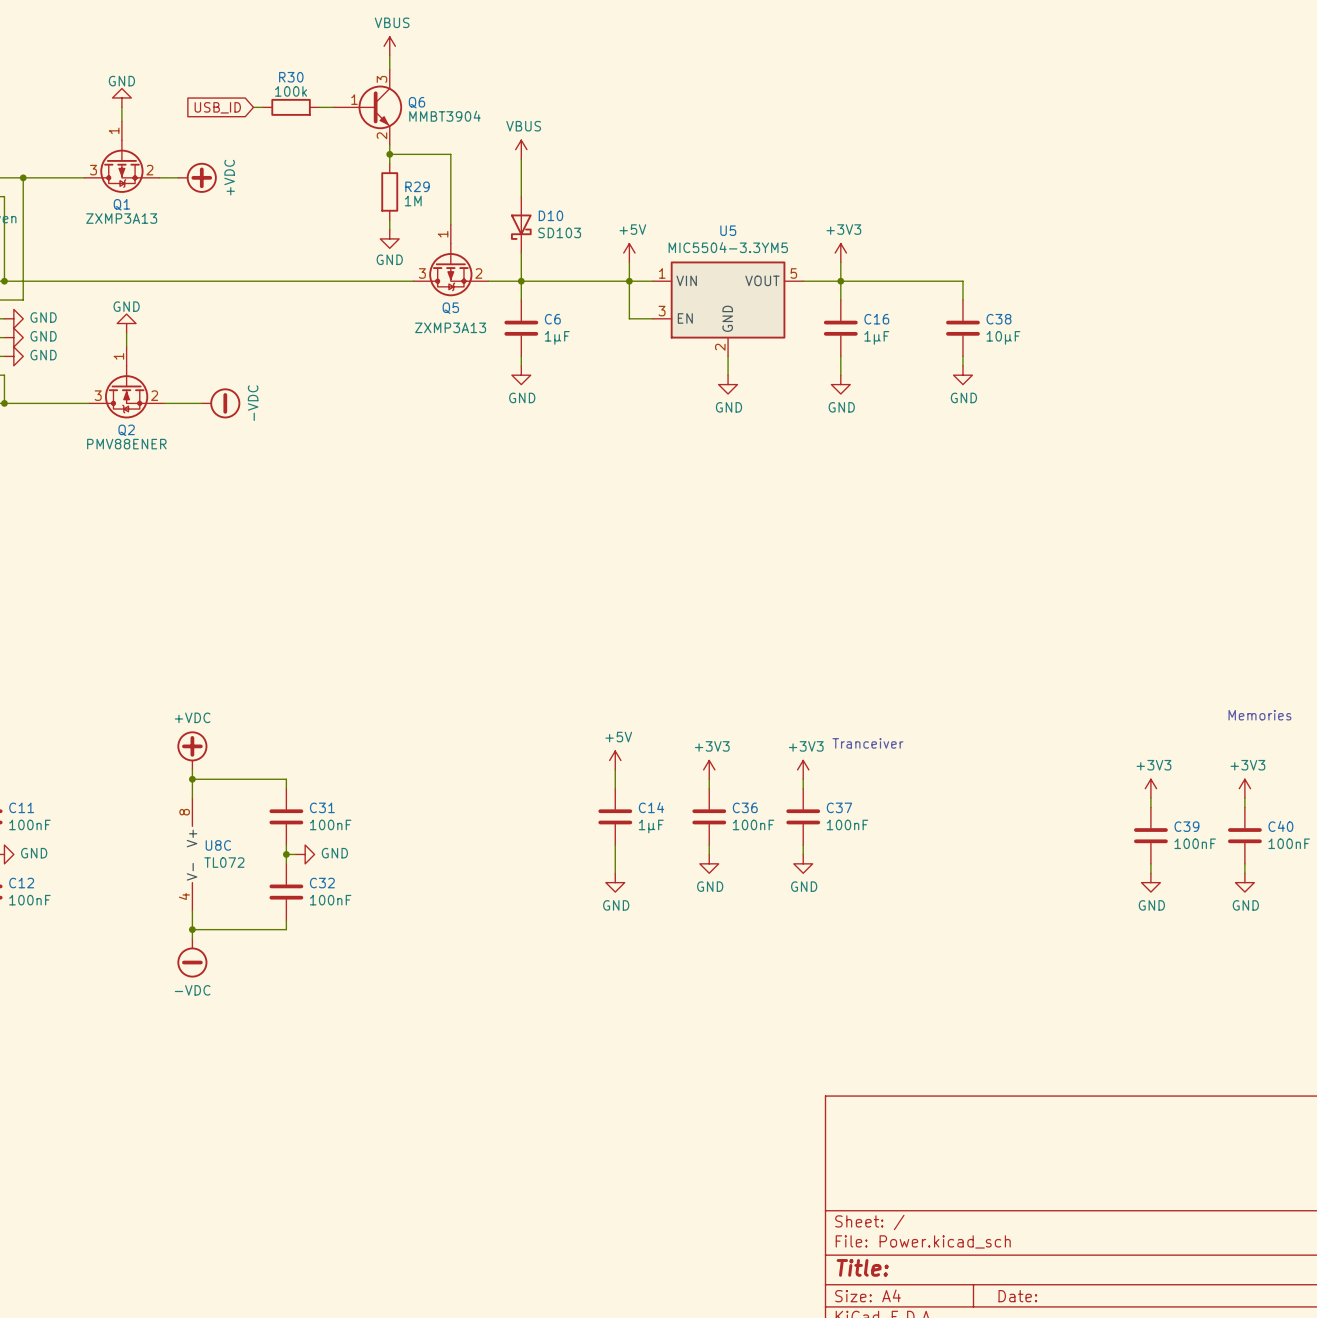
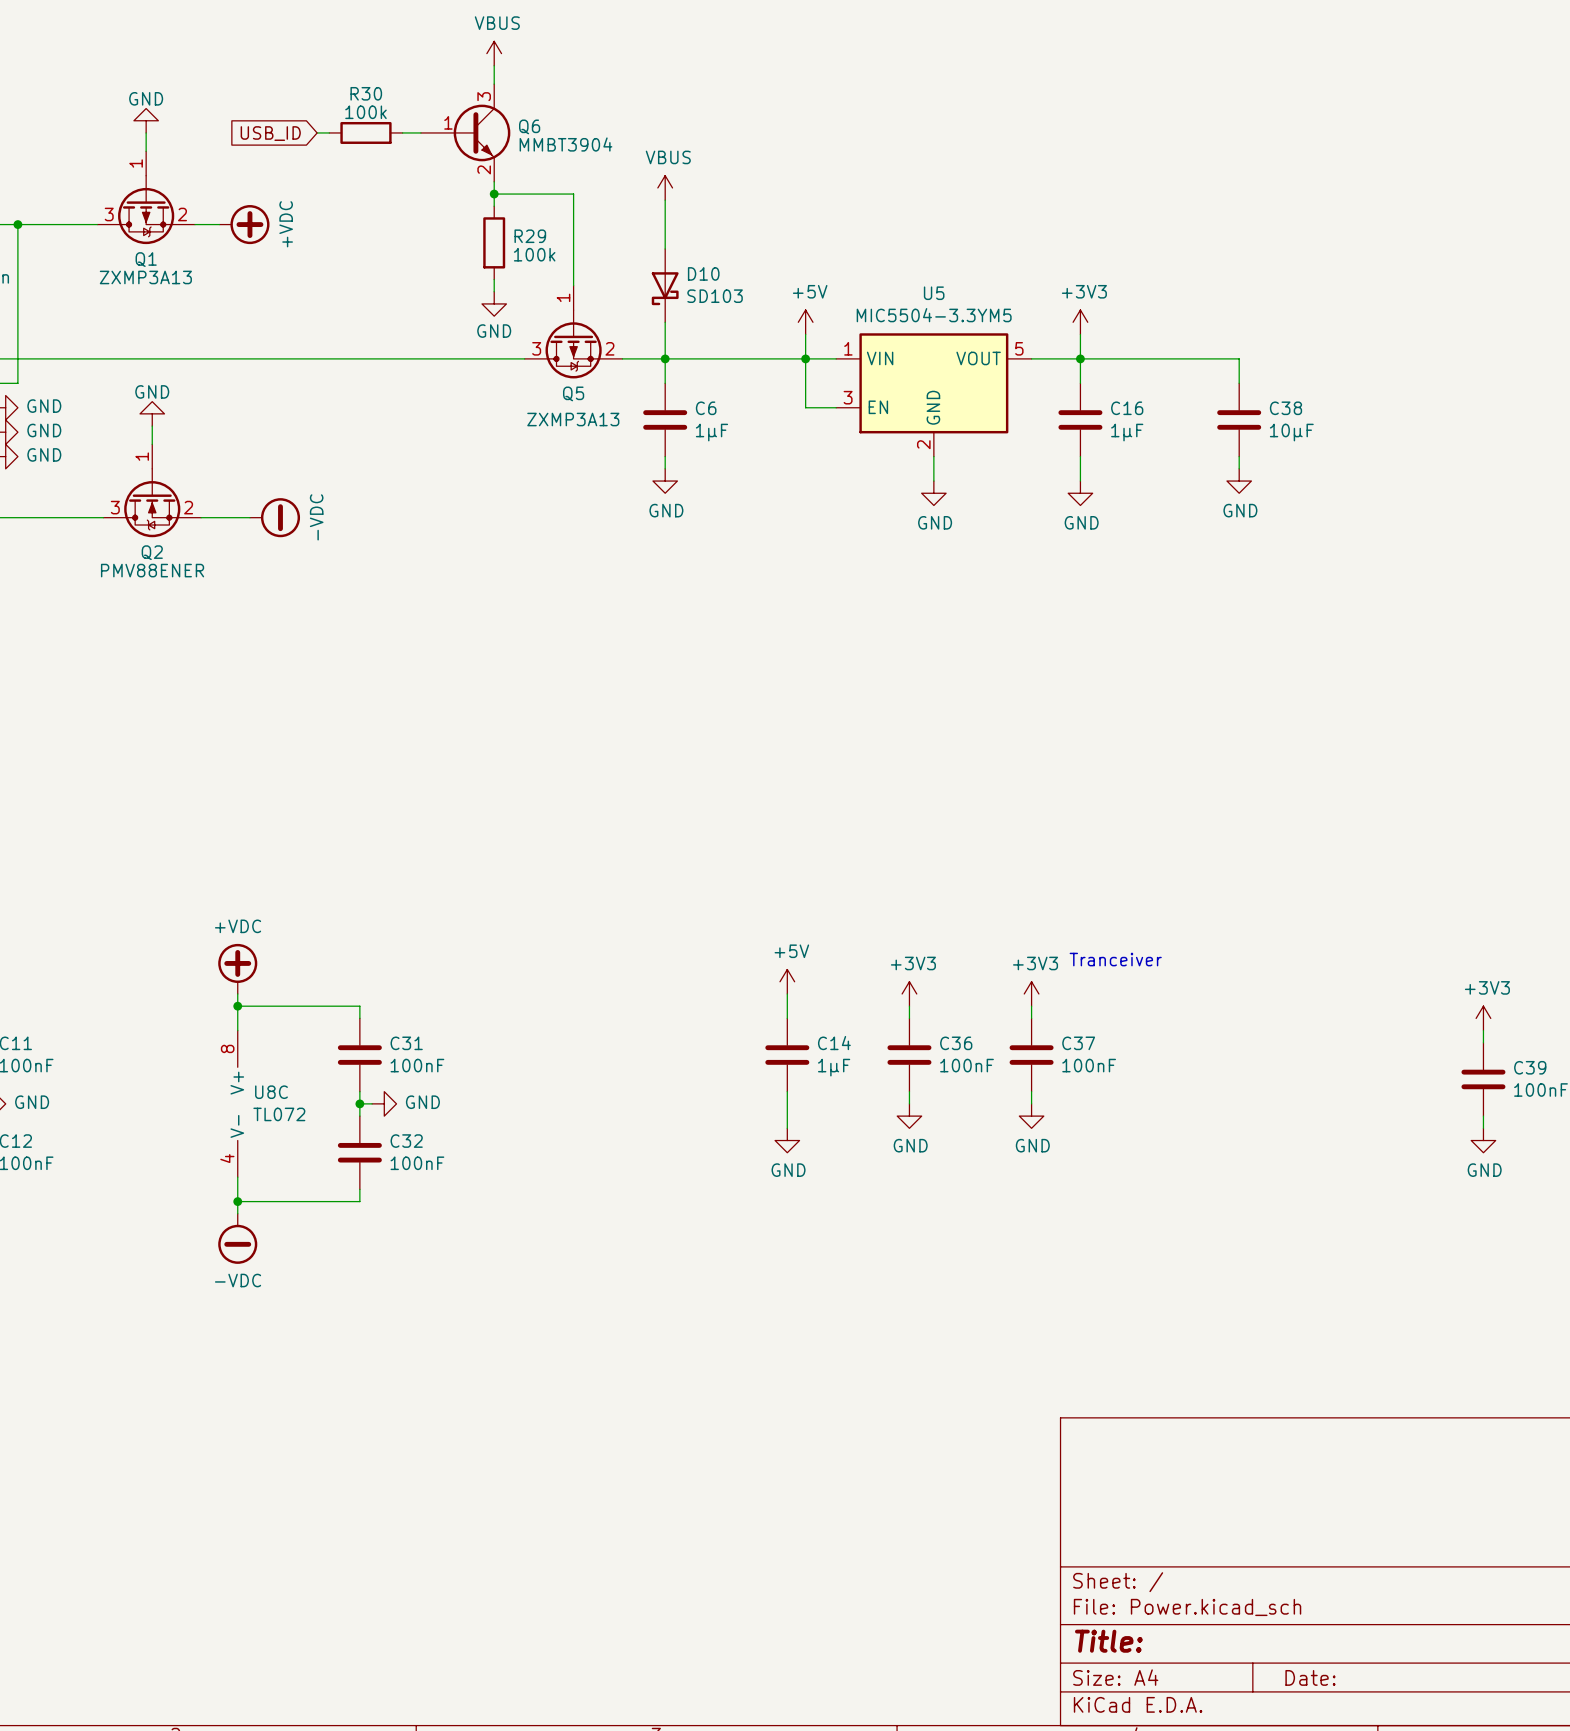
R29 value: 1M (413, 201) -> 100k (534, 254)

